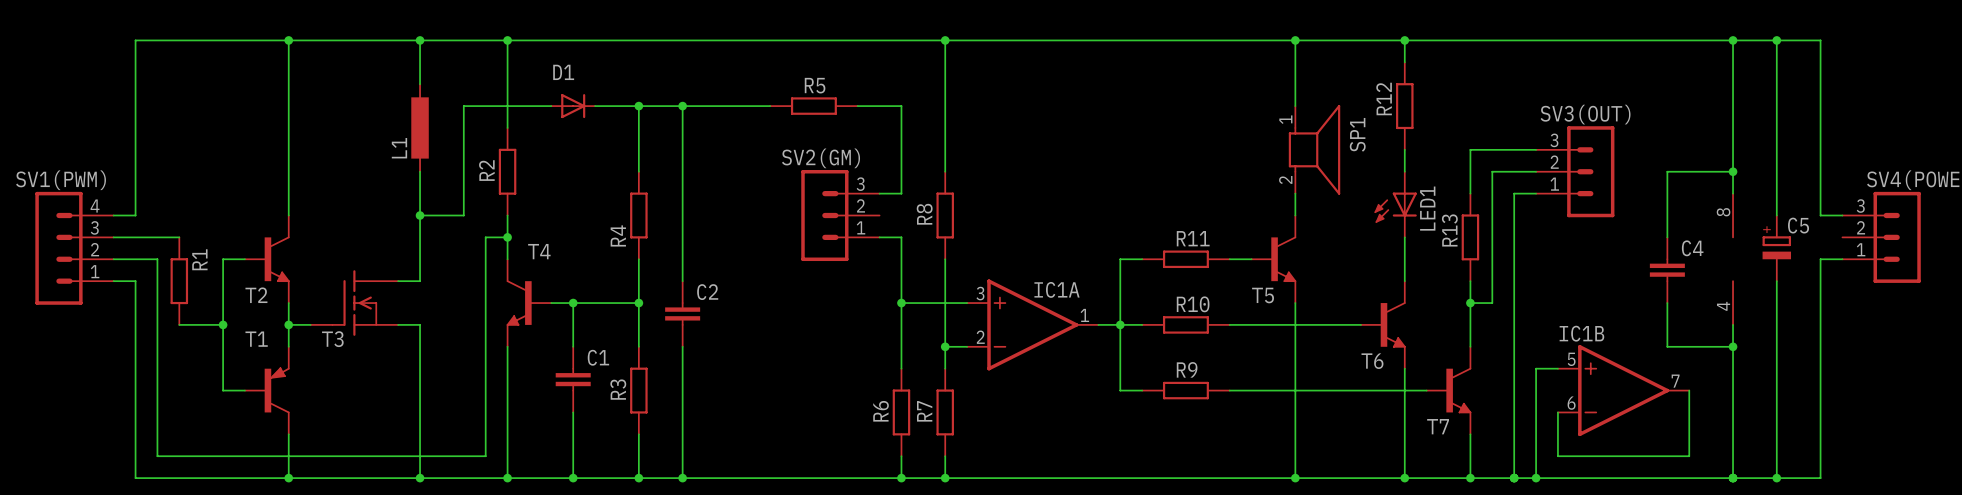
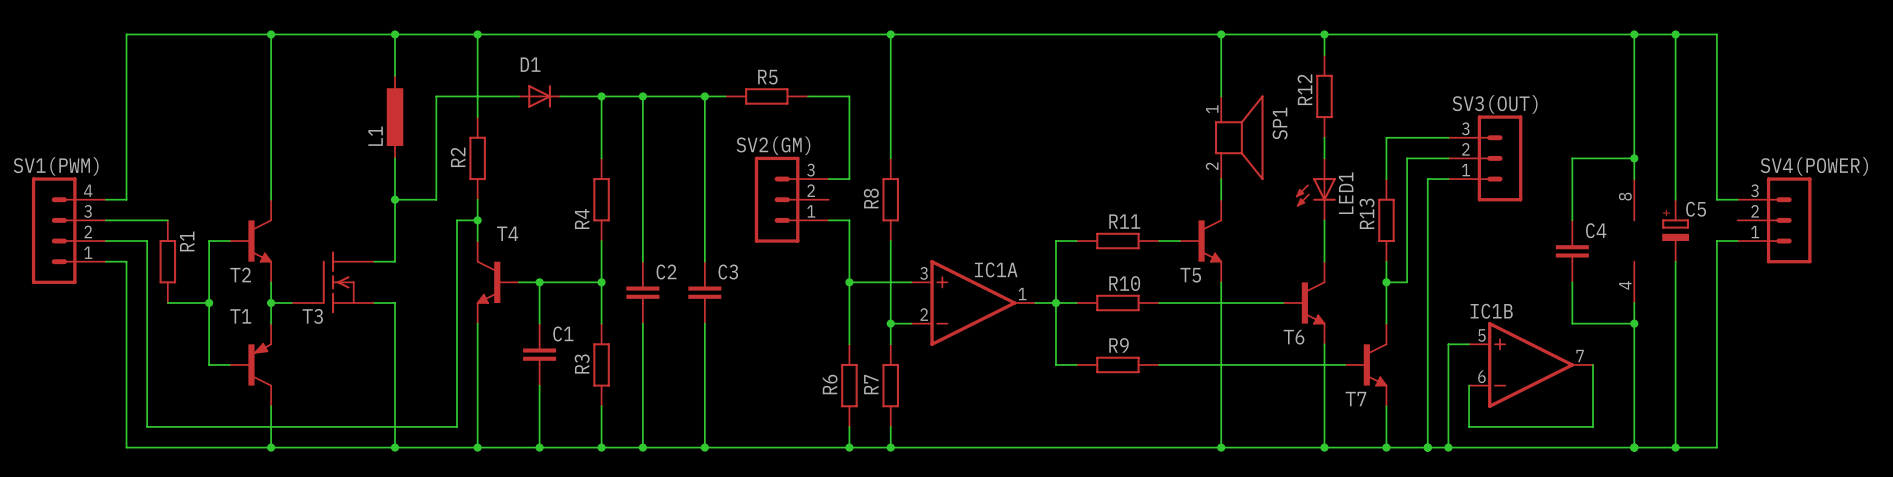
wire: none -> (704, 96) (704, 261)
junction: none -> (704, 96)
C3: none -> (704, 292)
wire: none -> (704, 323) (704, 447)
junction: none -> (704, 447)

